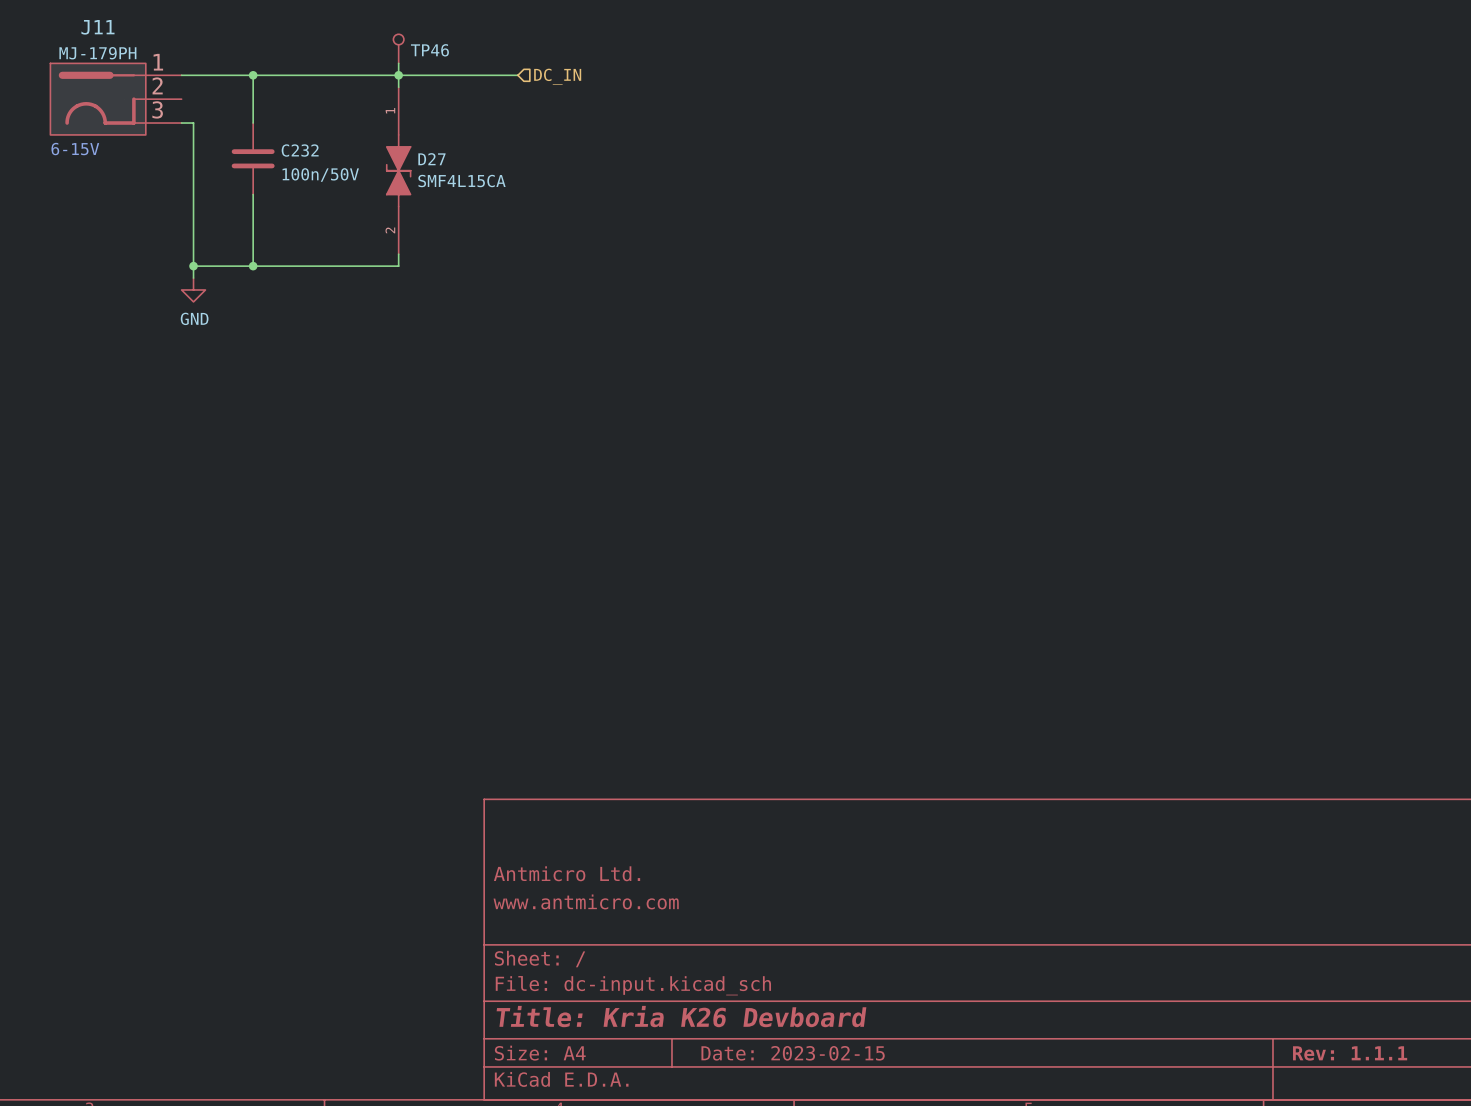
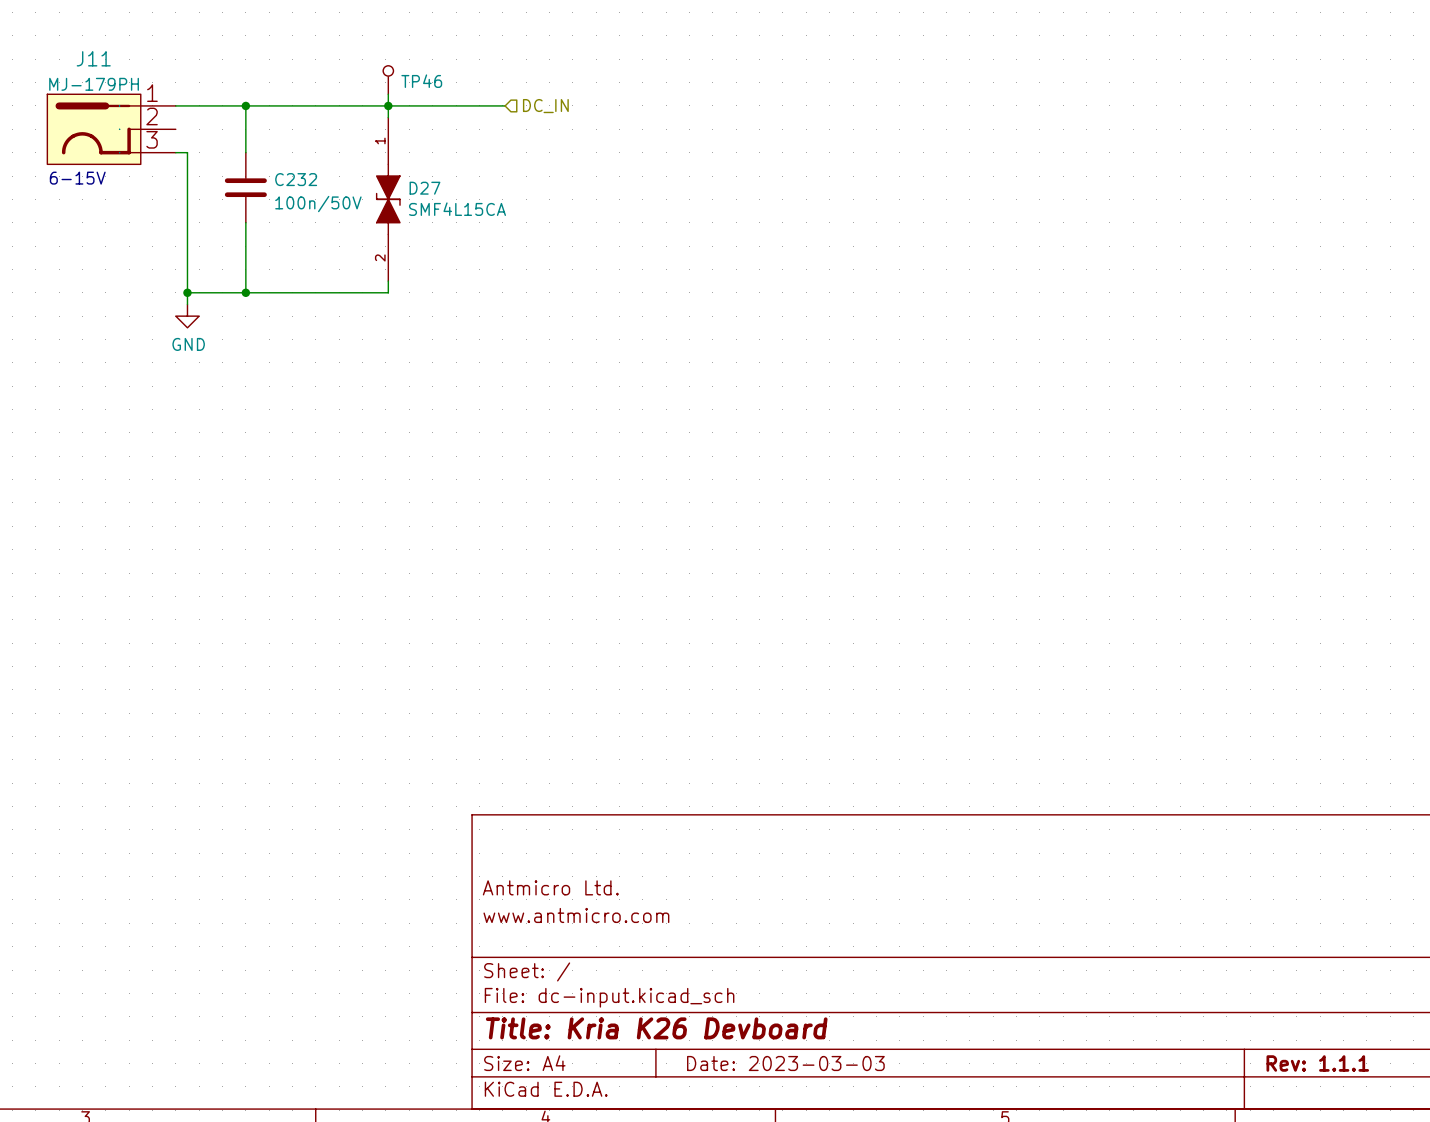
title block: Date: 2023-02-15 (793, 1053) -> Date: 2023-03-03 (785, 1063)

